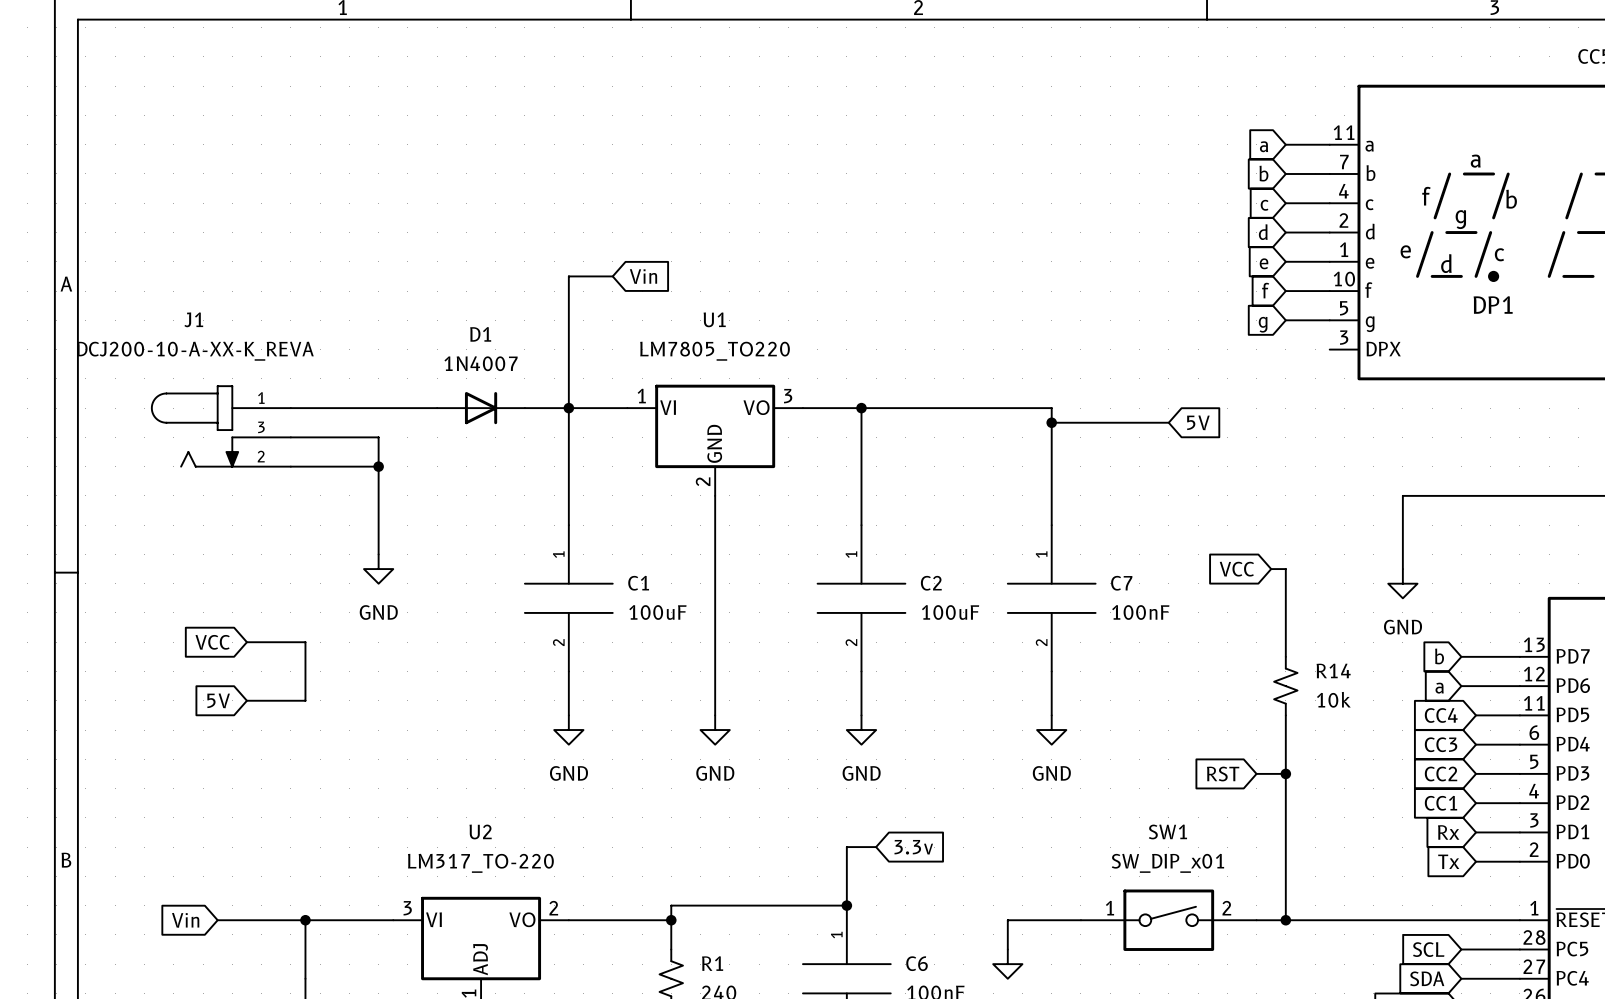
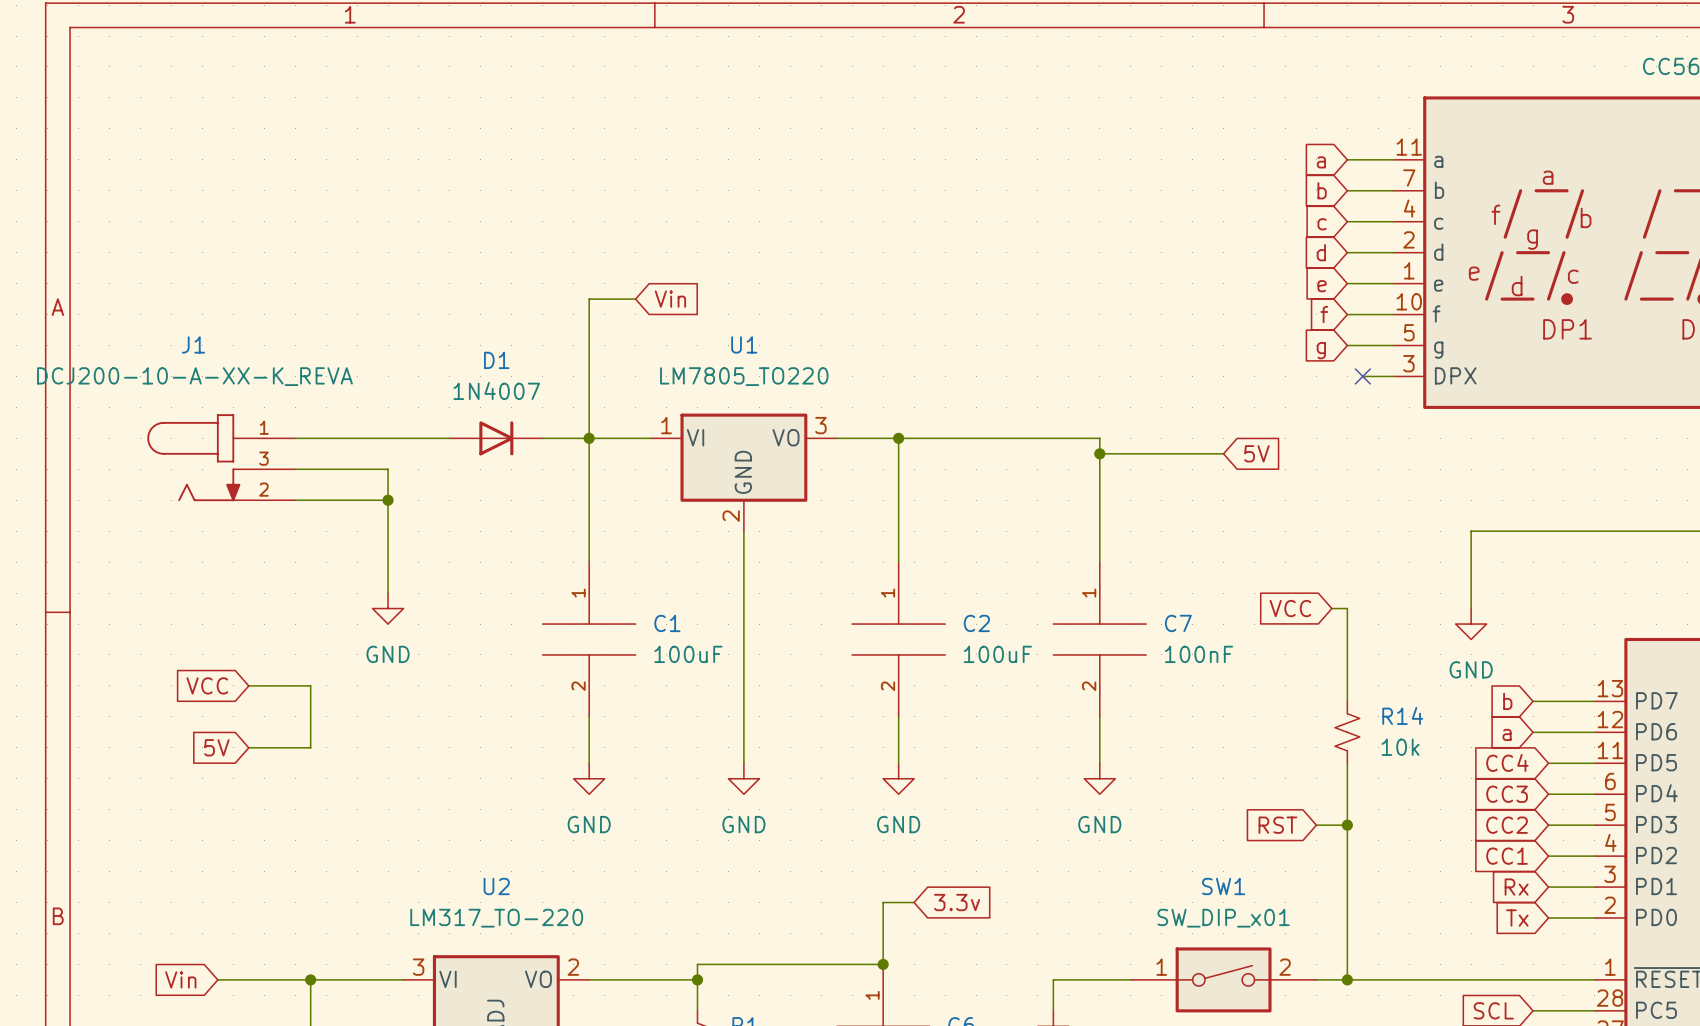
wire: none -> (1362, 376) (1393, 376)
no-connect mark: none -> (1362, 376)

